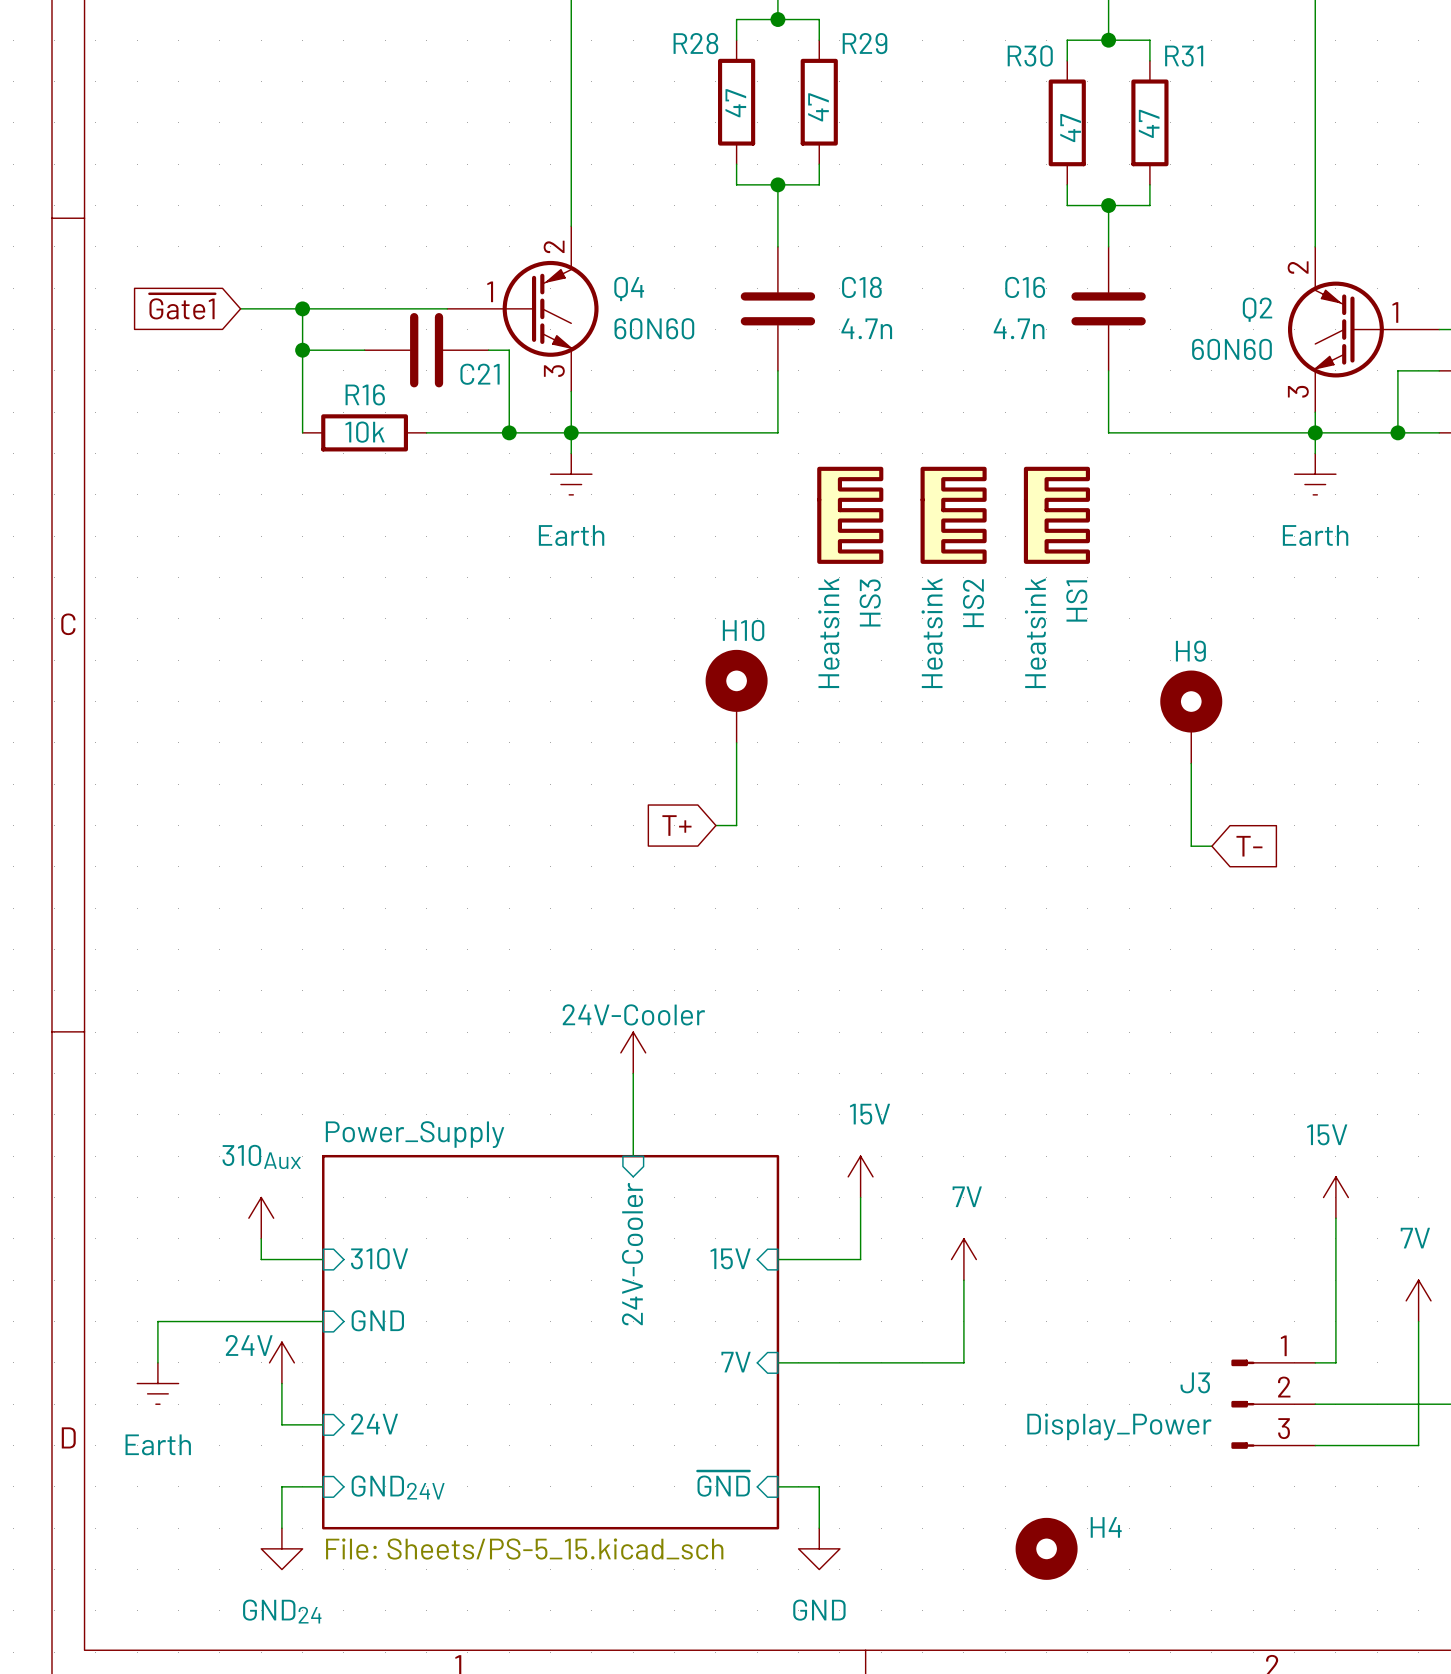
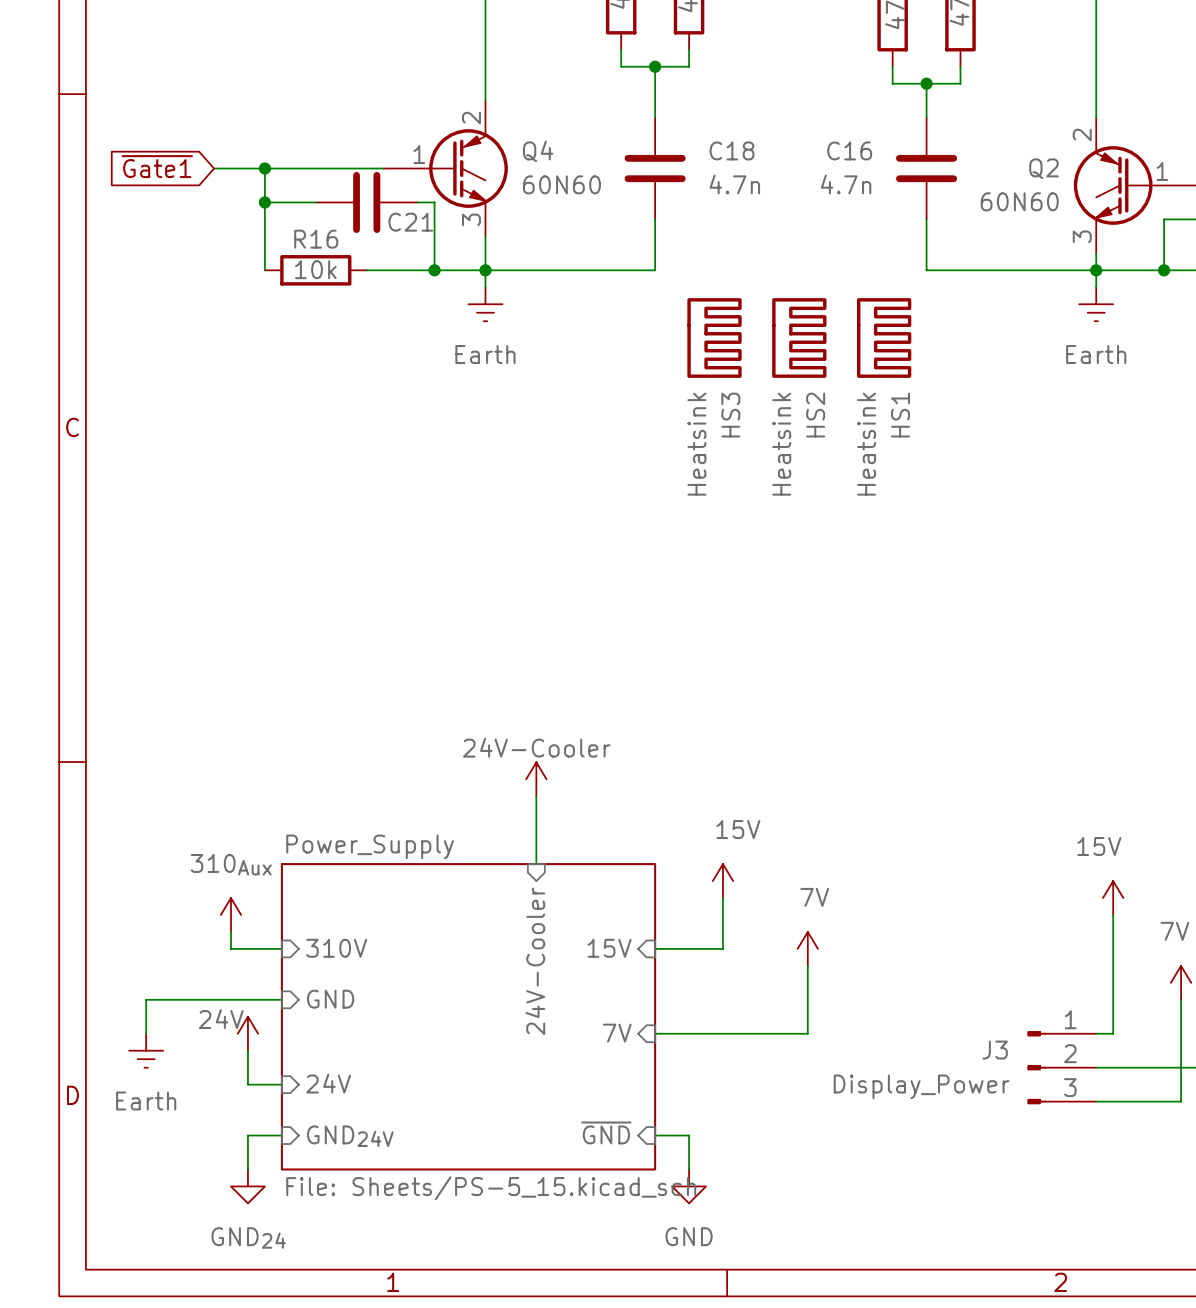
H10: (736, 696) -> none
H9: (1191, 717) -> none
wire: (736, 742) (736, 825) (715, 825) -> none
wire: (1191, 763) (1191, 846) (1211, 846) -> none
global label: T+ (676, 825) -> none
global label: T- (1249, 846) -> none
H4: (1046, 1548) -> none

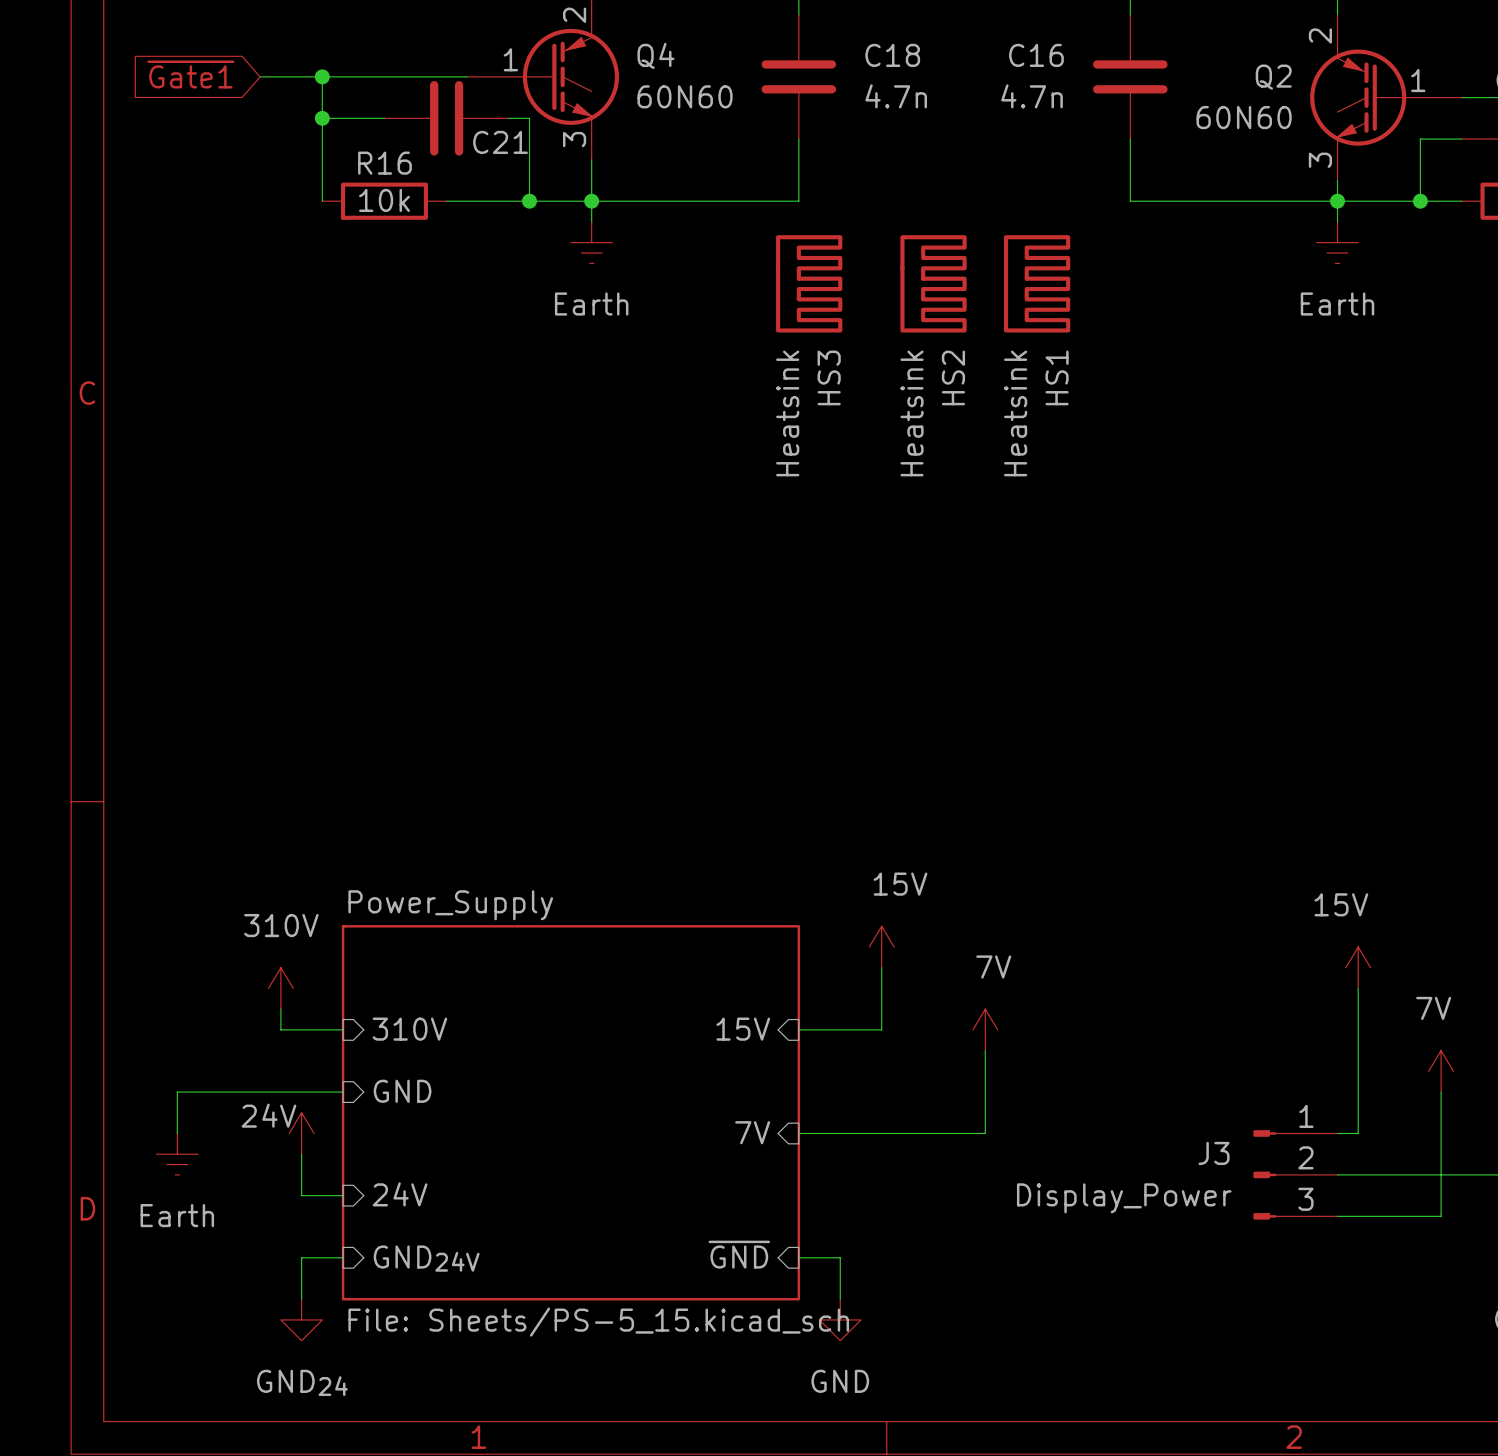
HS3 position: (714, 338) -> (809, 283)
HS2 position: (799, 338) -> (933, 283)
HS1 position: (884, 338) -> (1037, 283)
power symbol: 24V-Cooler (536, 779) -> none
wire: (536, 796) (536, 864) -> none
power symbol: 310Aux (231, 914) -> 310V (280, 988)
sheet pin: 24V-Cooler (535, 961) -> none

